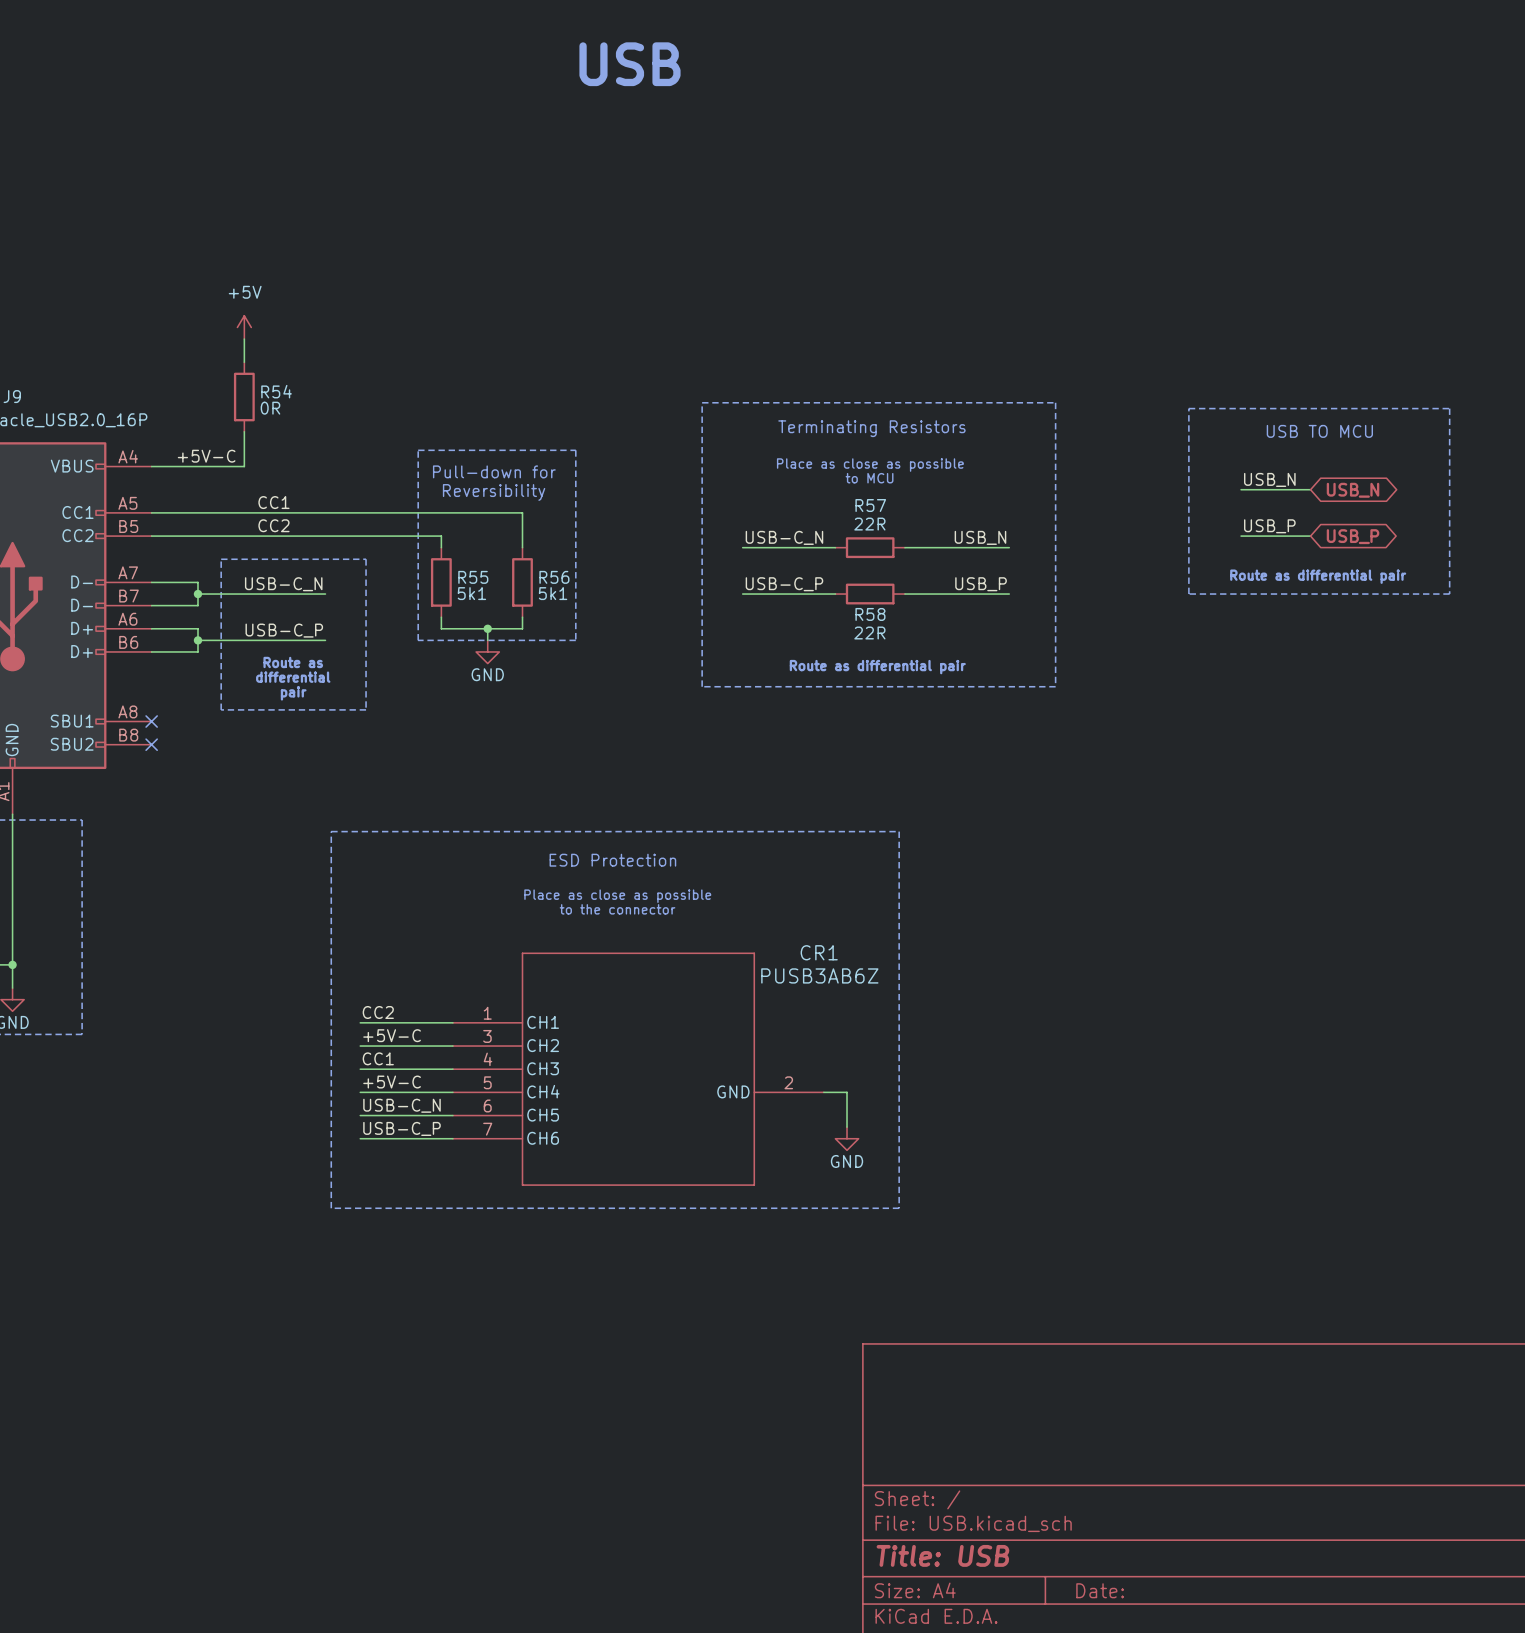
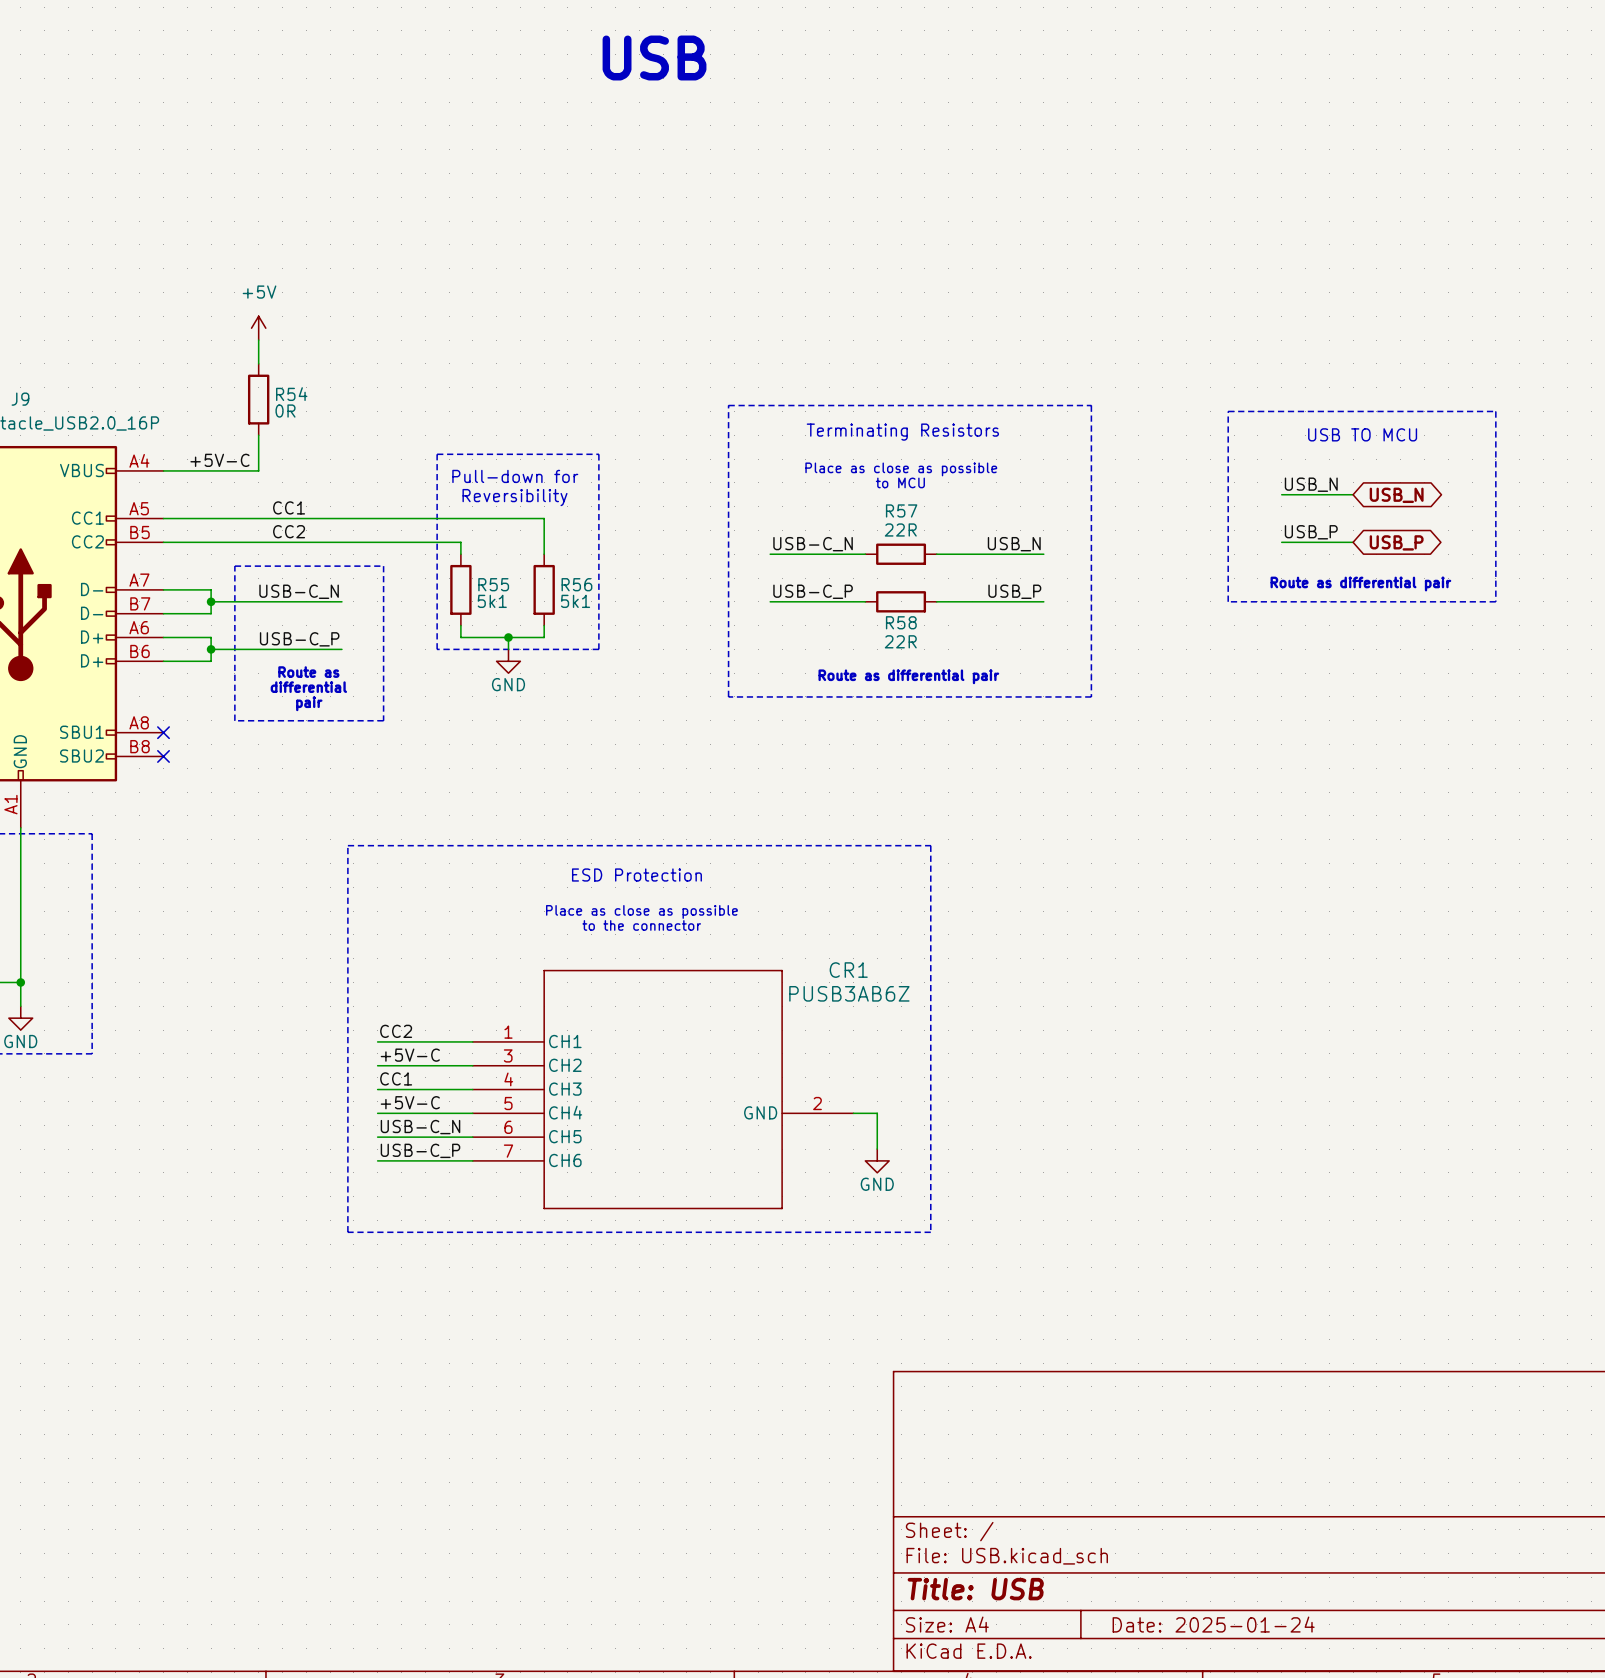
title block: Date: (1100, 1590) -> Date: 2025-01-24 (1213, 1624)

